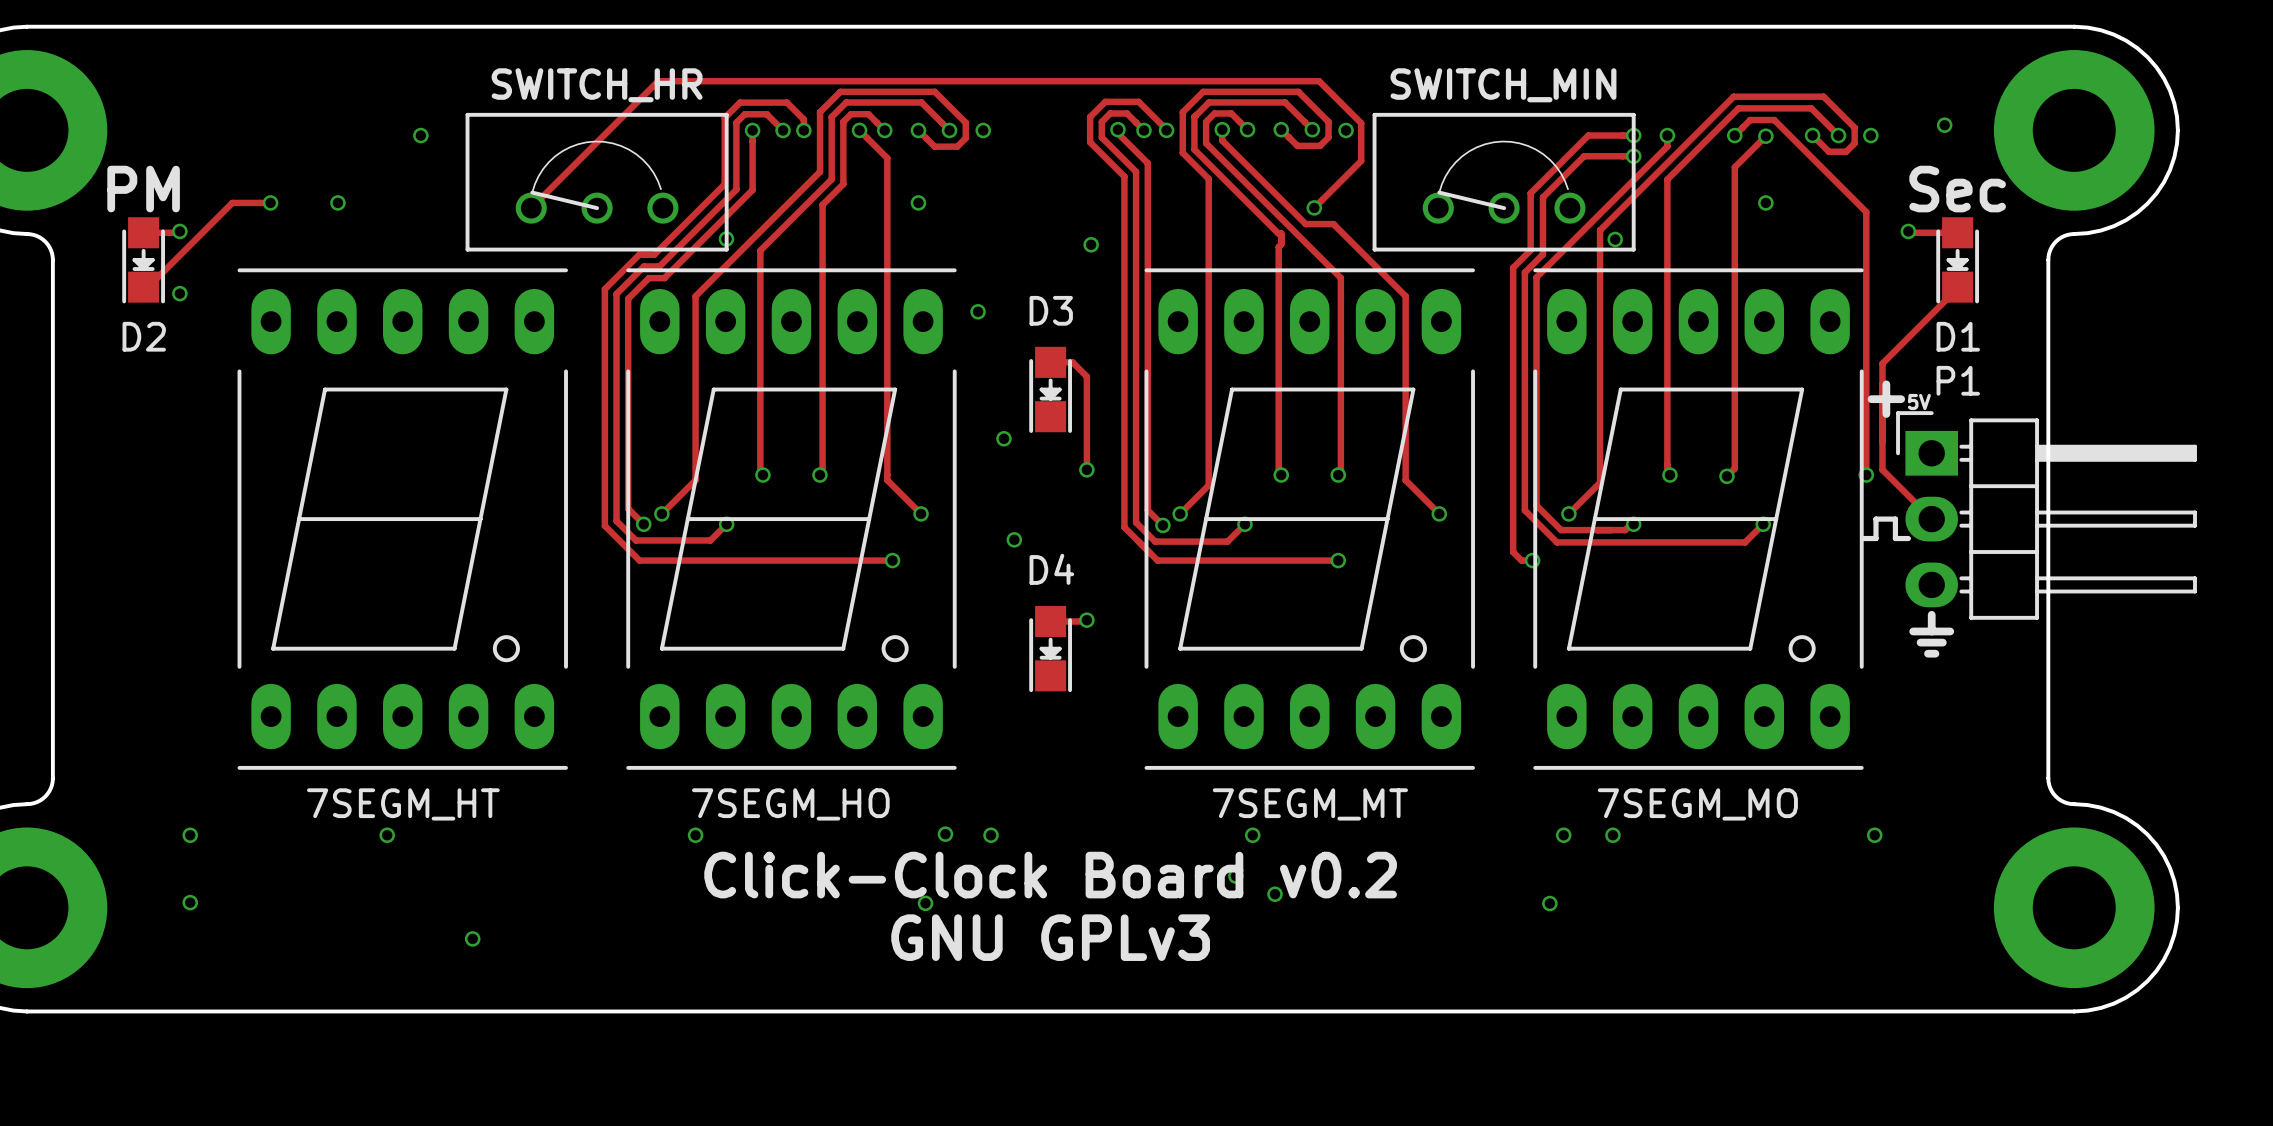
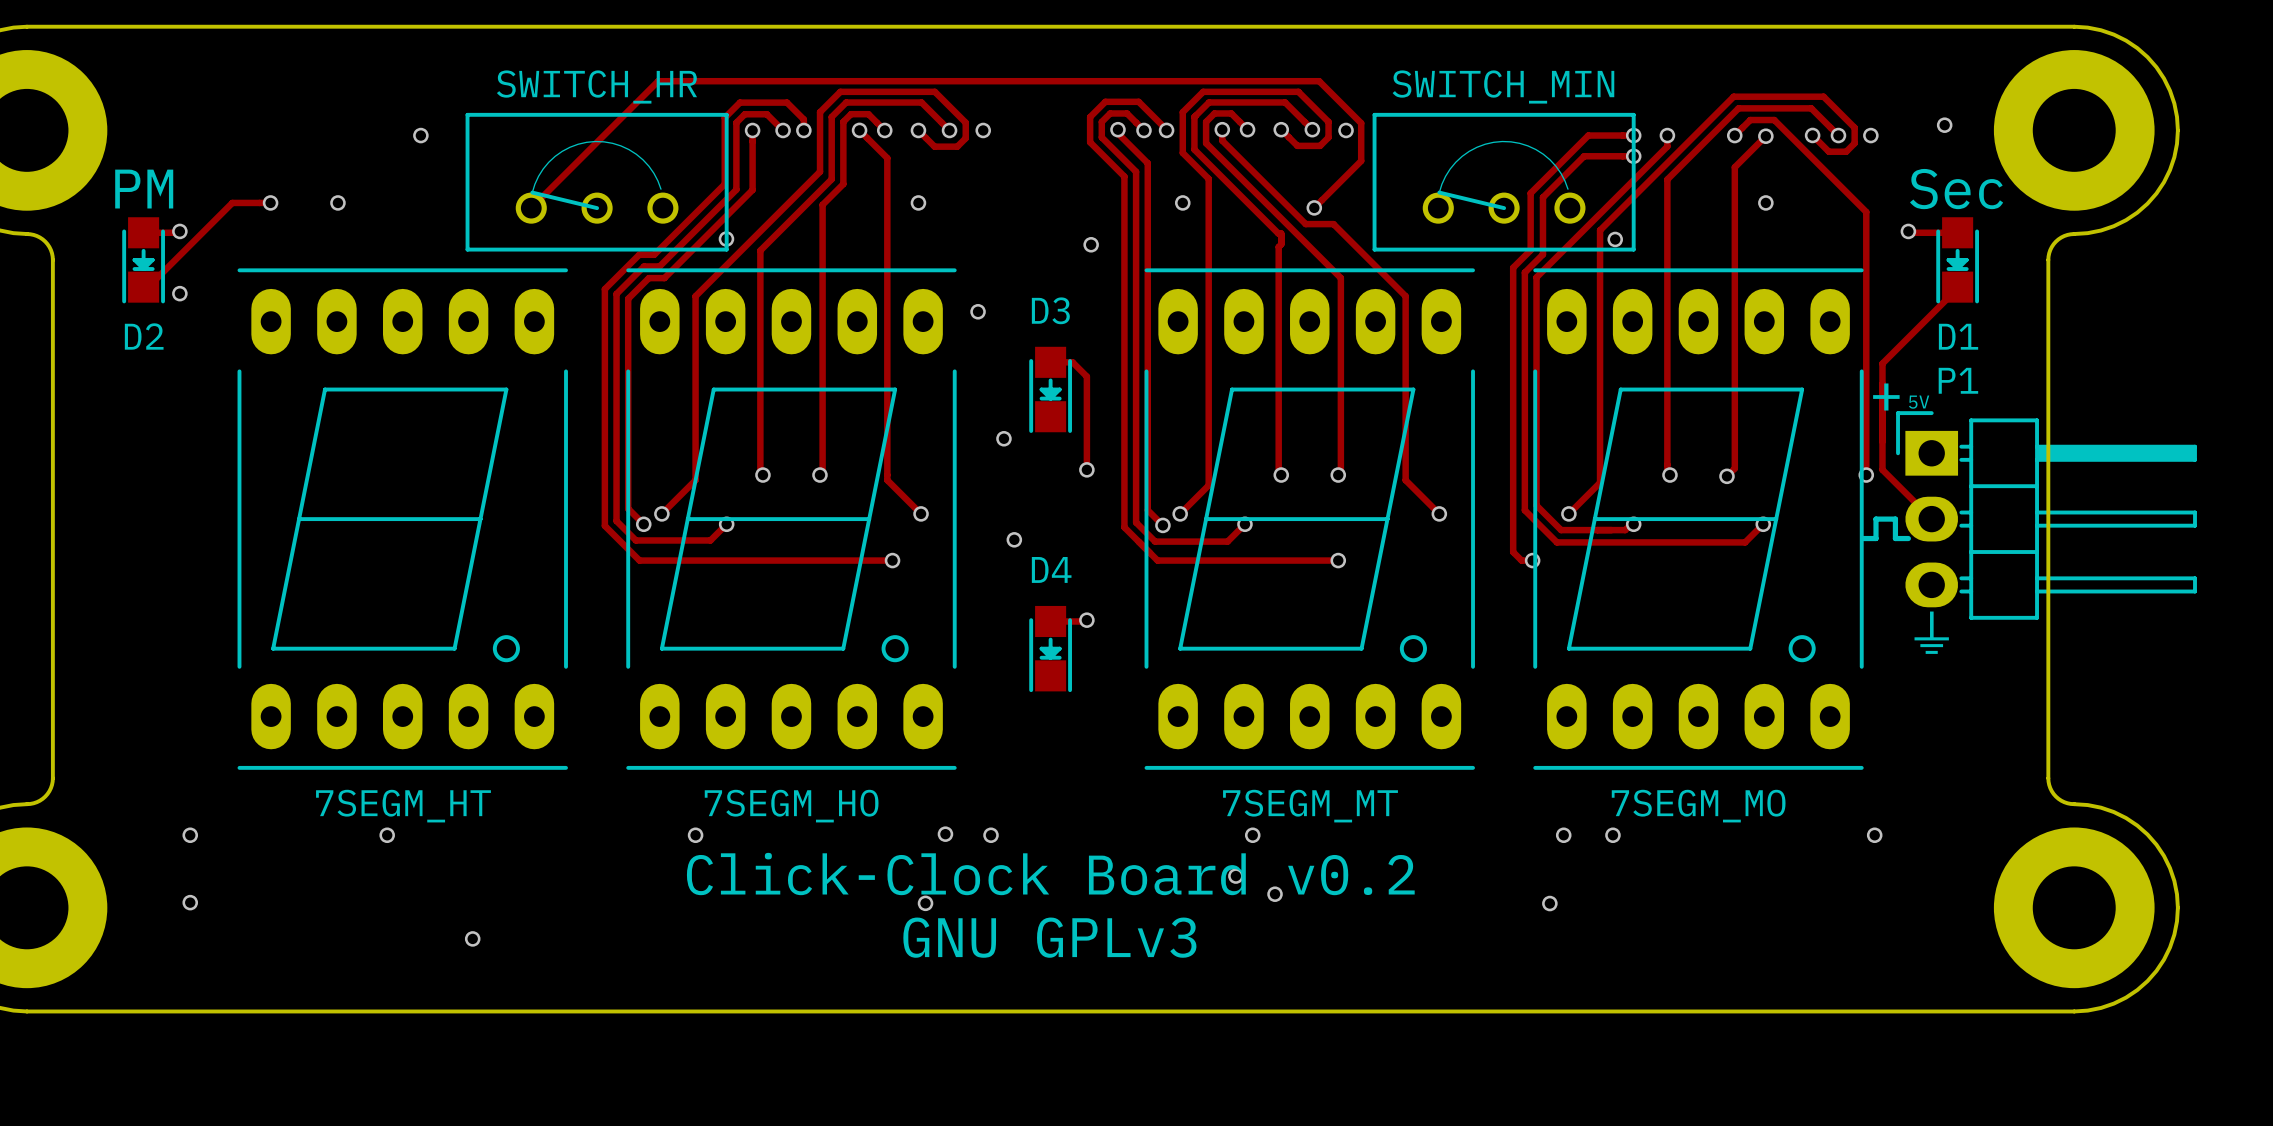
via: none -> (1182, 202)

